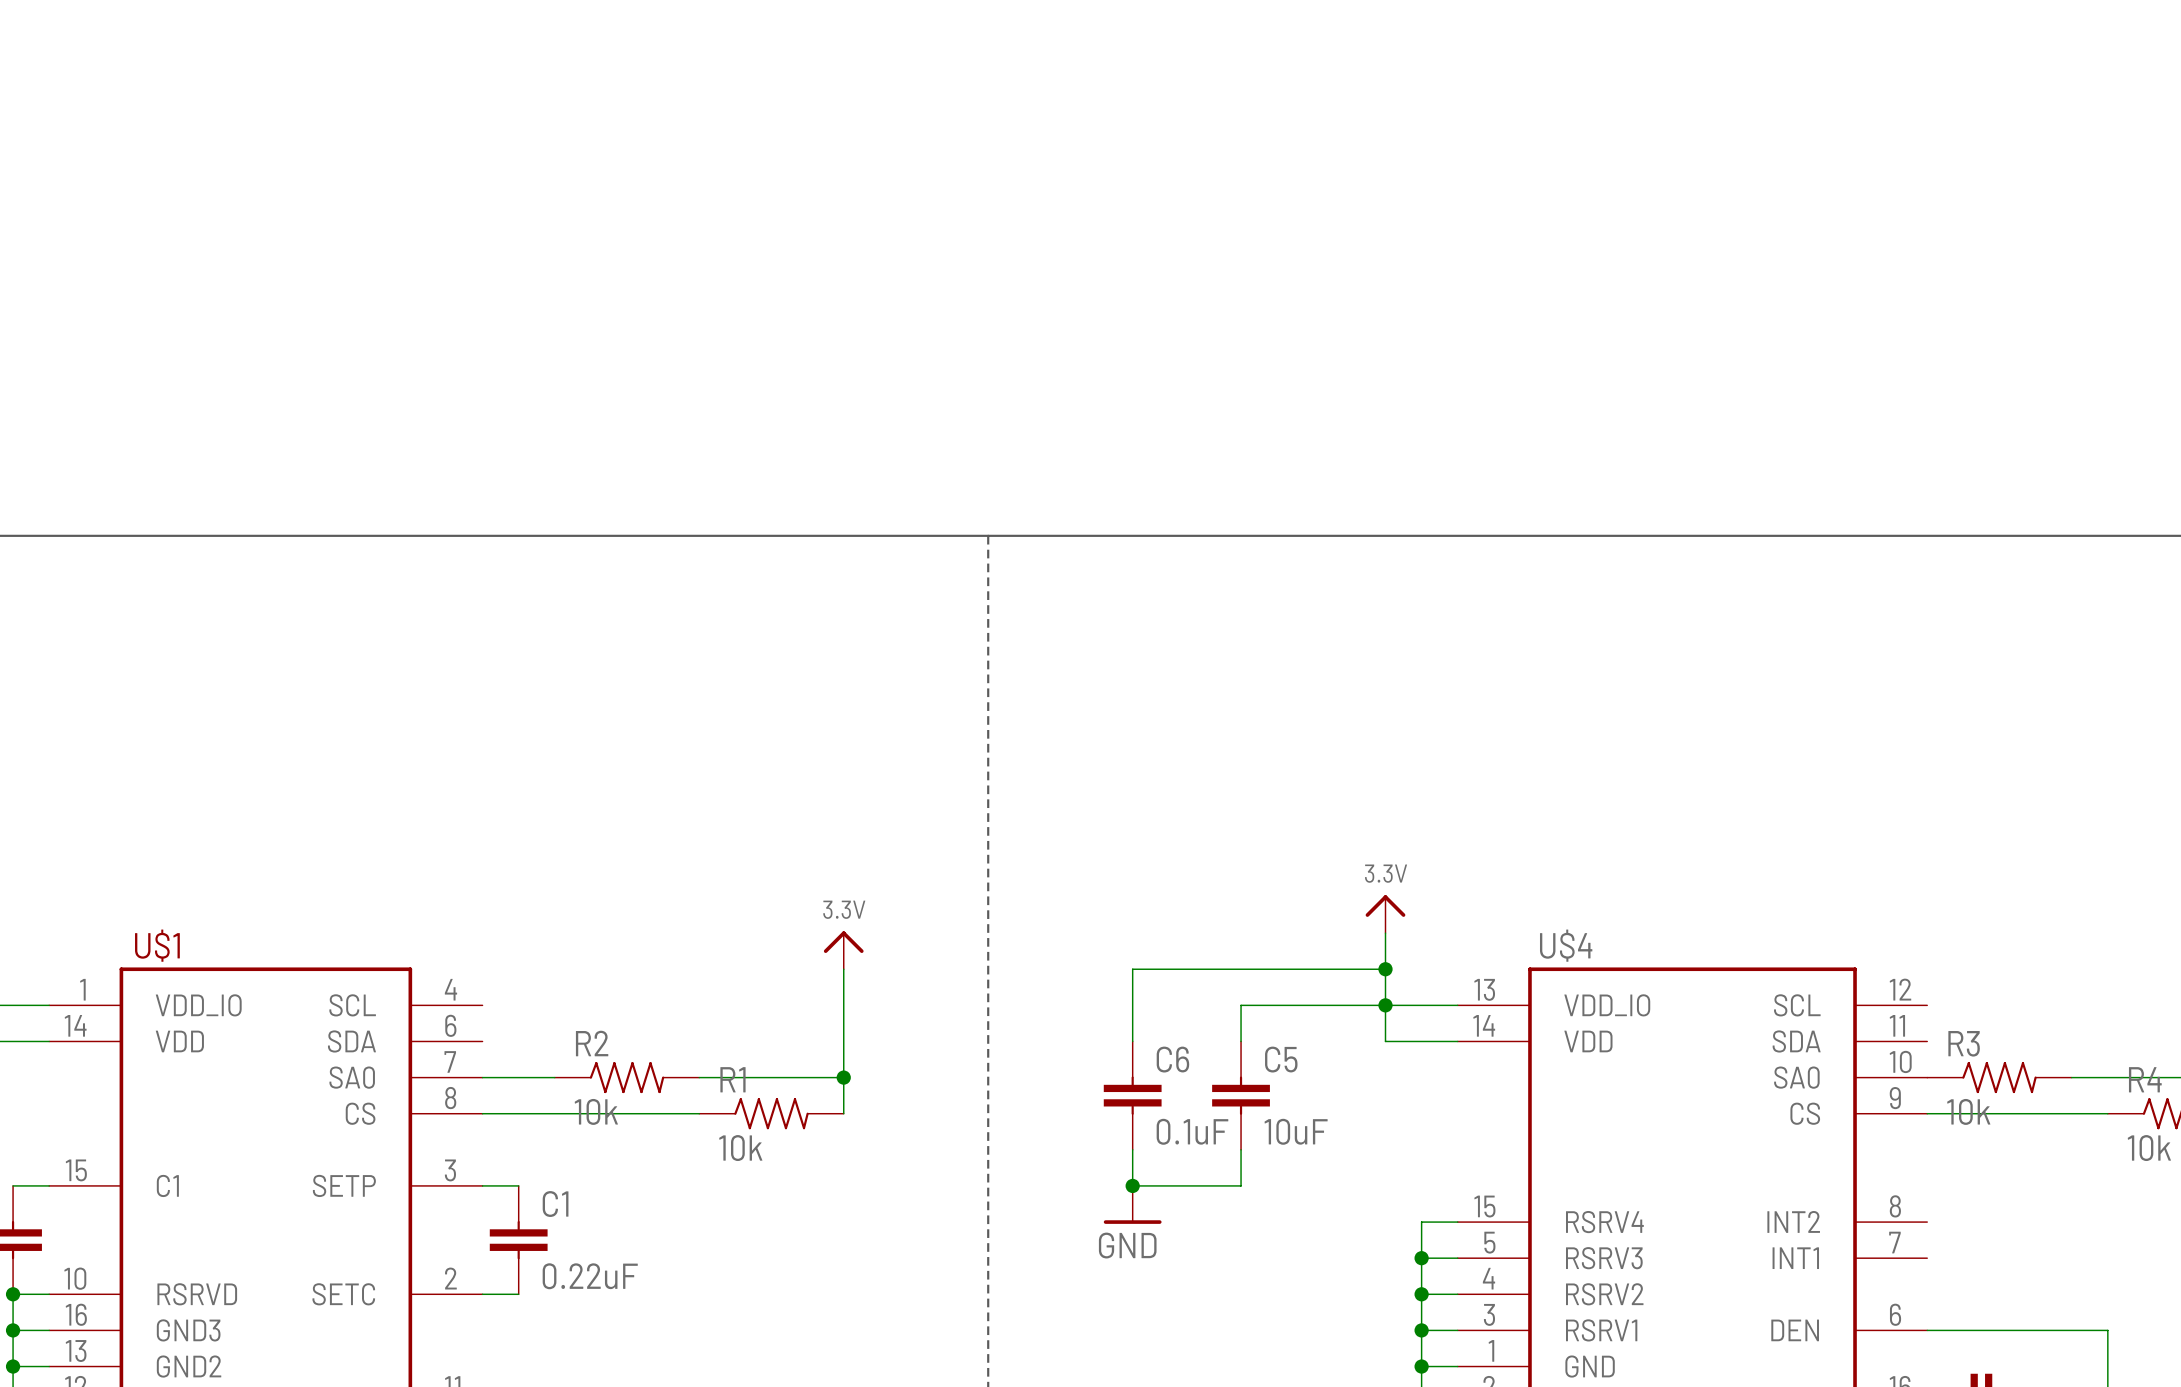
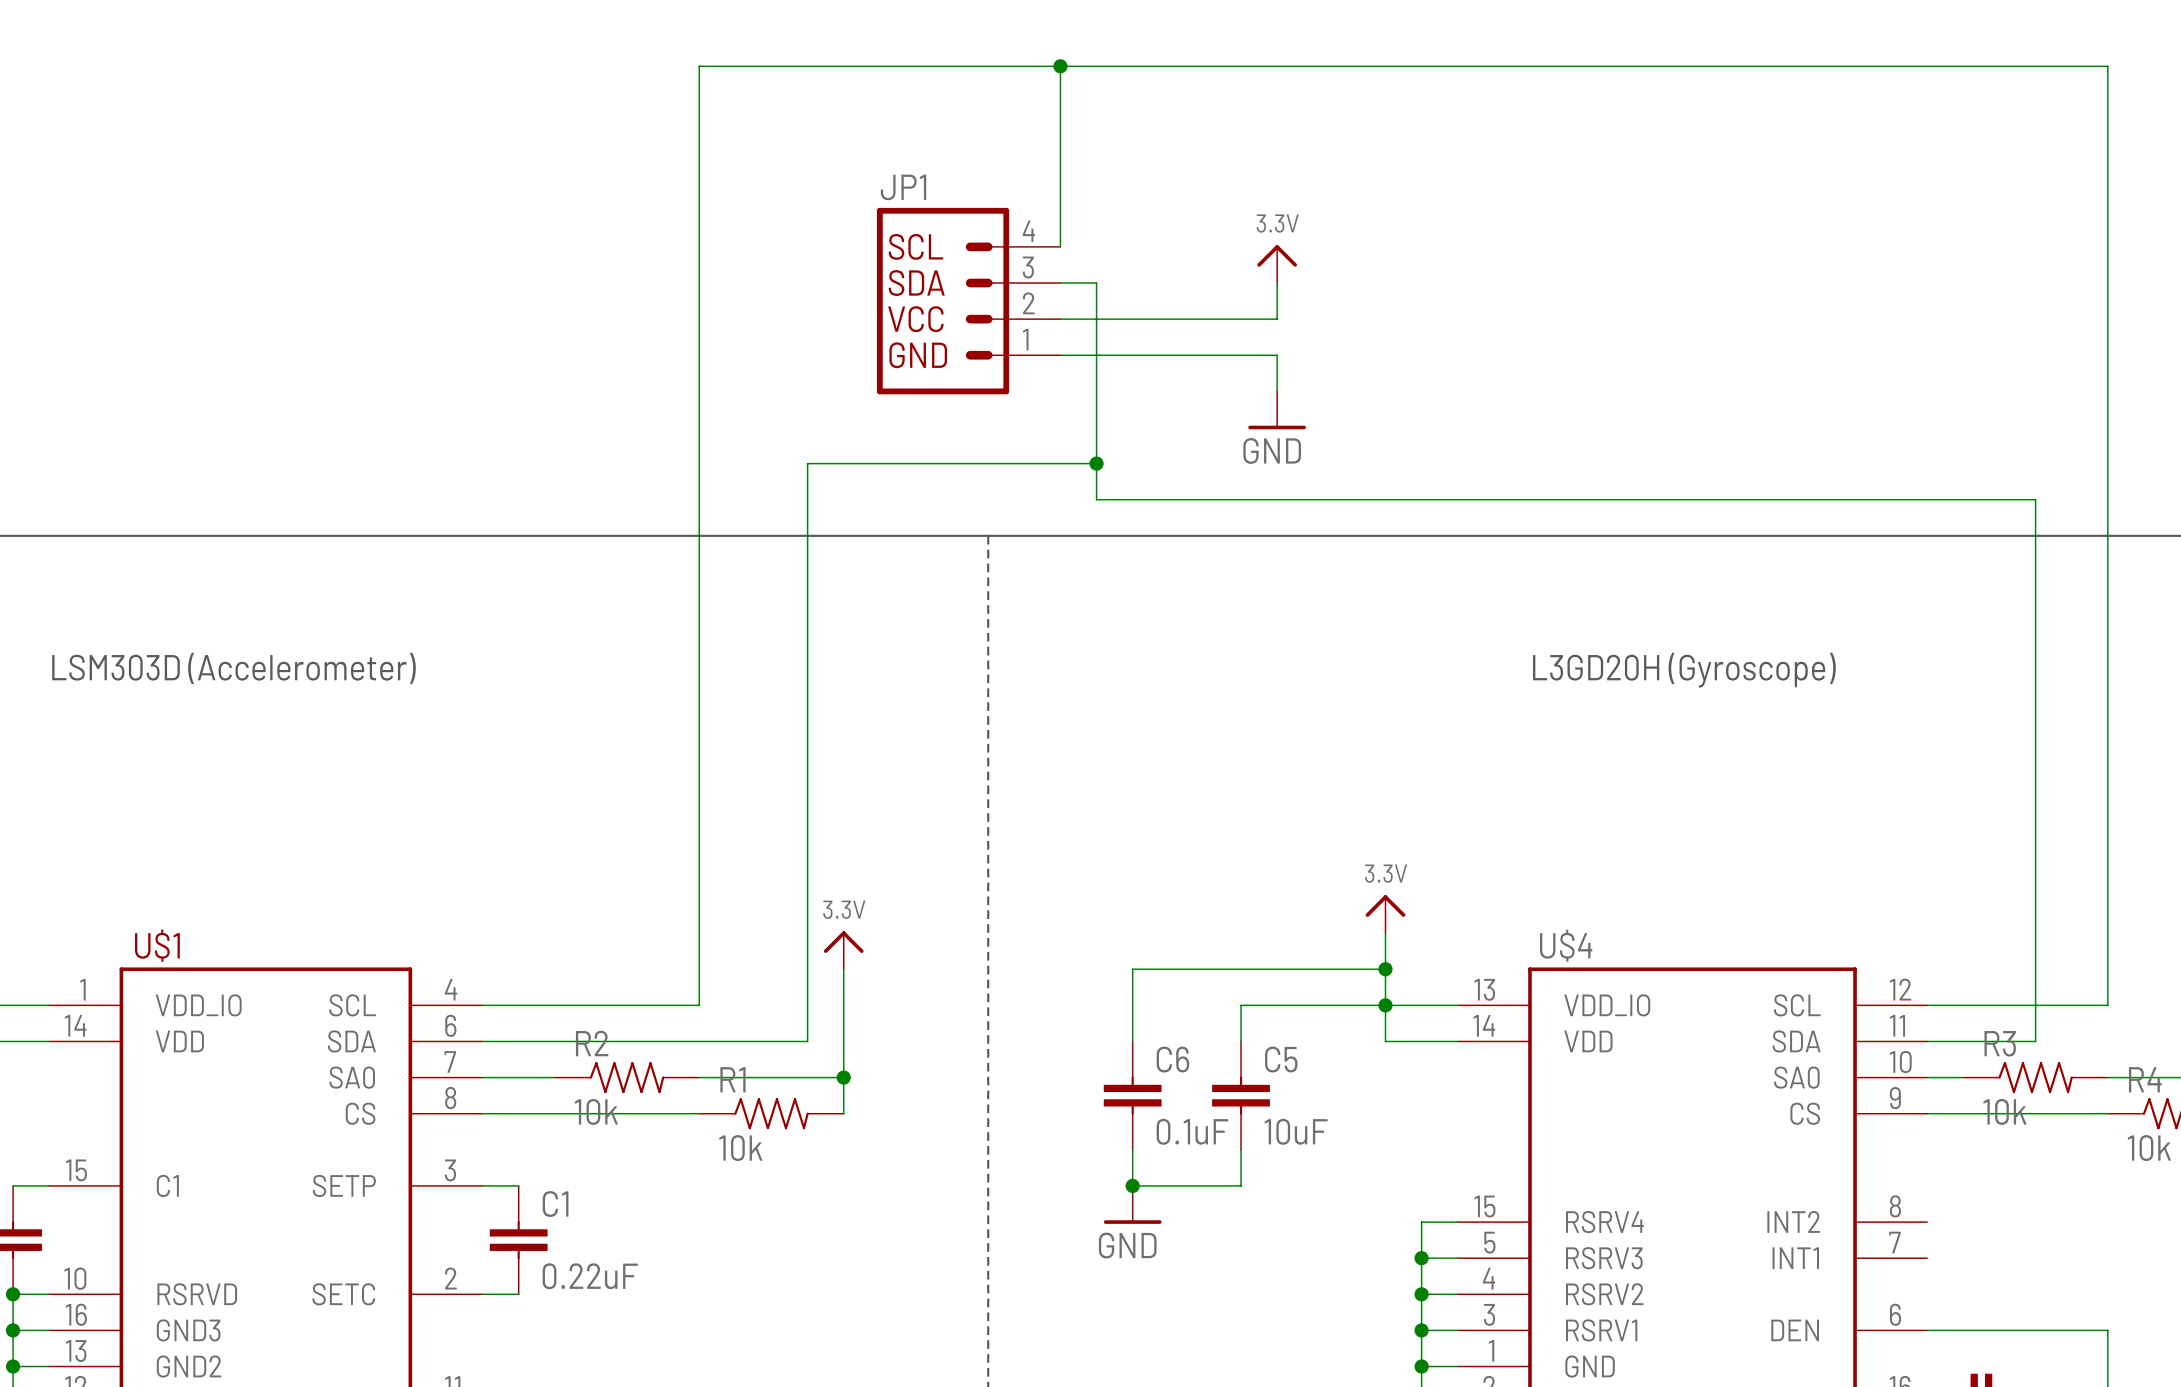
wire: none -> (1060, 66) (1060, 246)
junction: none -> (1060, 66)
power symbol: none -> 3.3V (1277, 264)
wire: none -> (1060, 283) (1096, 283) (1096, 499) (2035, 499) (2035, 1041) (1927, 1041)
wire: none -> (1277, 283) (1277, 319) (1060, 319)
JP1: none -> (968, 301)
wire: none -> (1060, 355) (1277, 355) (1277, 391)
power symbol: none -> GND (1277, 410)
wire: none -> (1096, 463) (807, 463) (807, 1041) (482, 1041)
junction: none -> (1096, 463)
text: none -> LSM303D (Accelerometer) (234, 668)
text: none -> L3GD20H (Gyroscope) (1684, 670)
wire: none -> (482, 1005) (699, 1005) (699, 66) (2107, 66) (2107, 1005) (1927, 1005)
R3 position: (1999, 1077) -> (2035, 1077)

